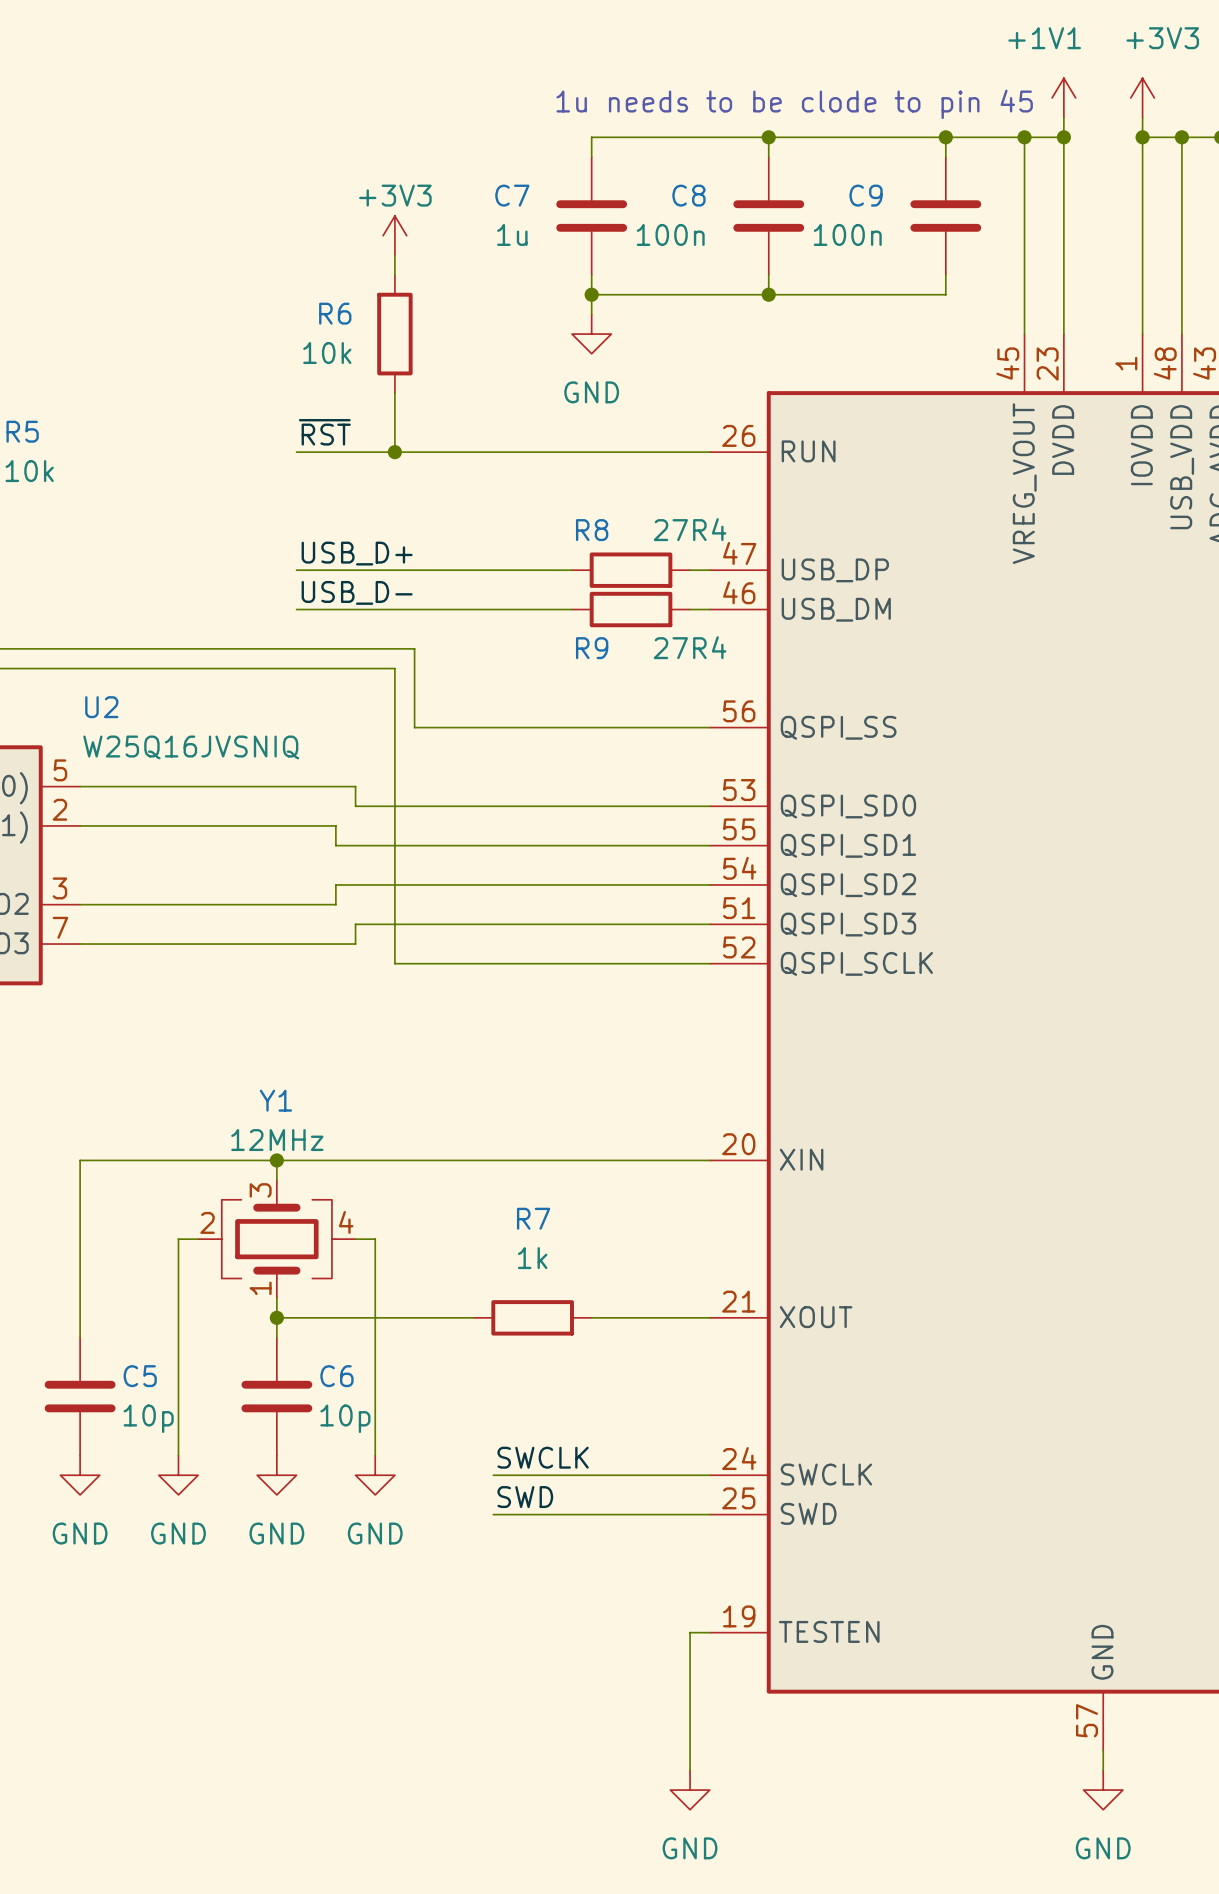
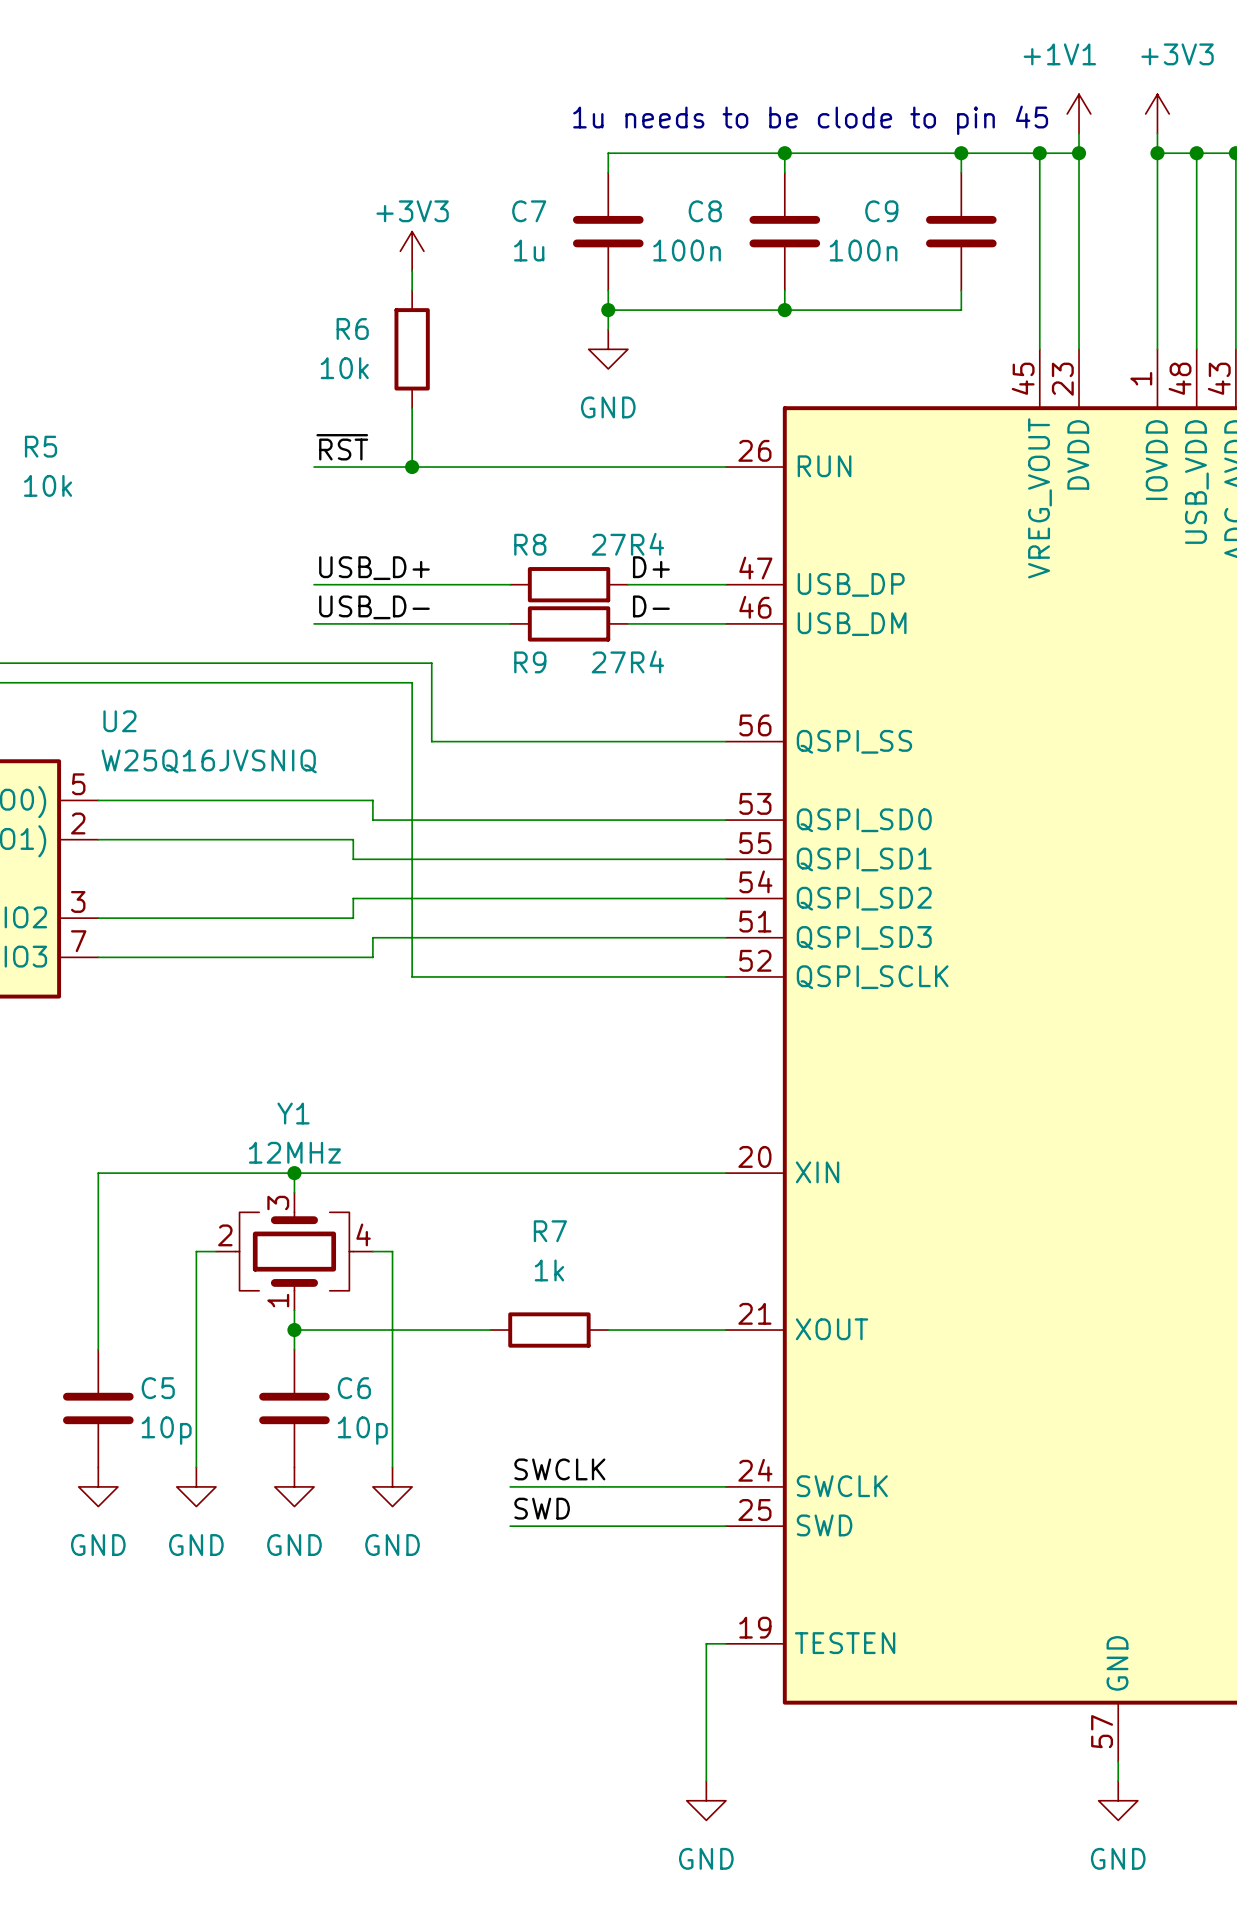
label: none -> D+ (651, 567)
wire: (493, 570) (571, 570) -> (627, 584) (706, 584)
R8 position: (631, 570) -> (569, 584)
label: none -> D- (651, 606)
wire: (493, 609) (571, 609) -> (627, 623) (706, 623)
R9 position: (631, 609) -> (569, 623)

